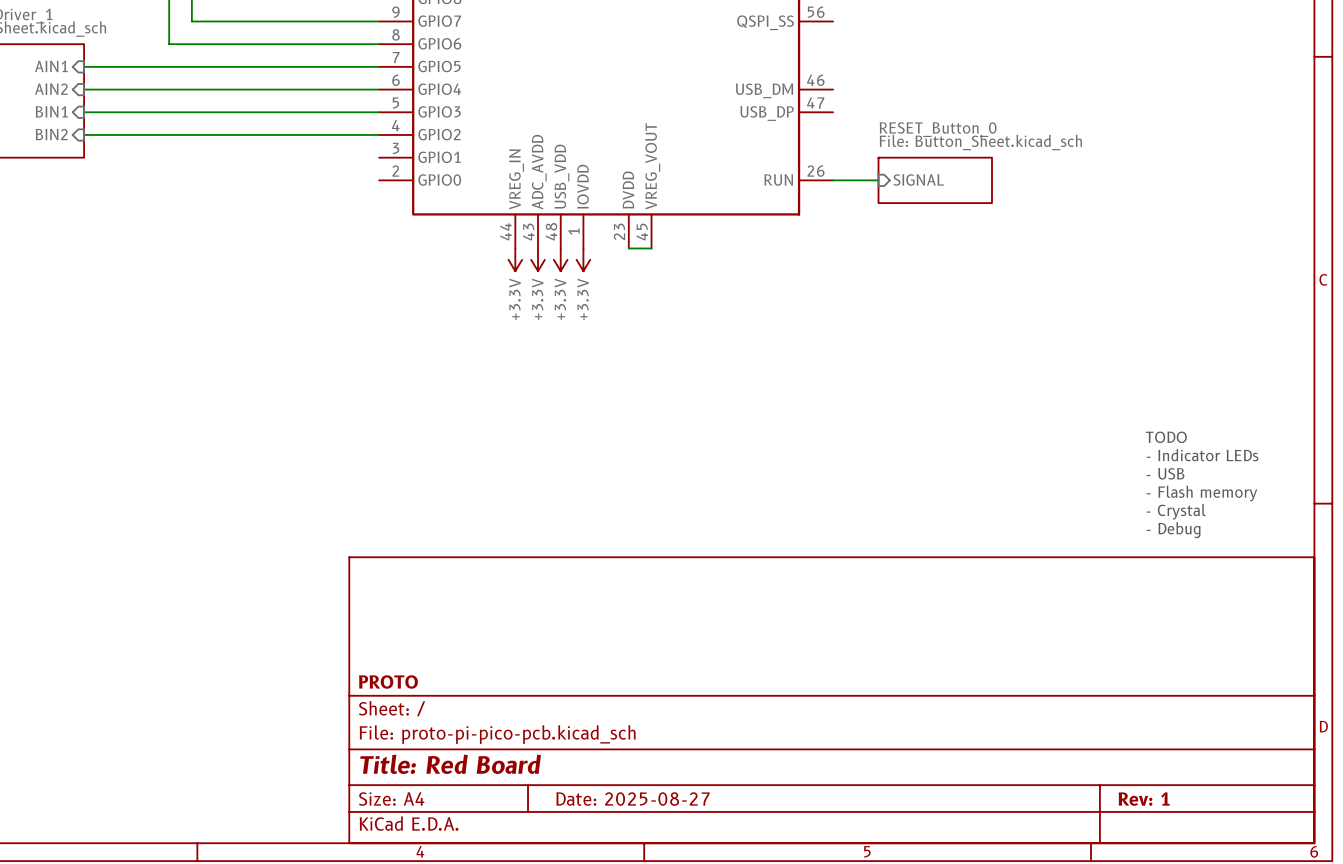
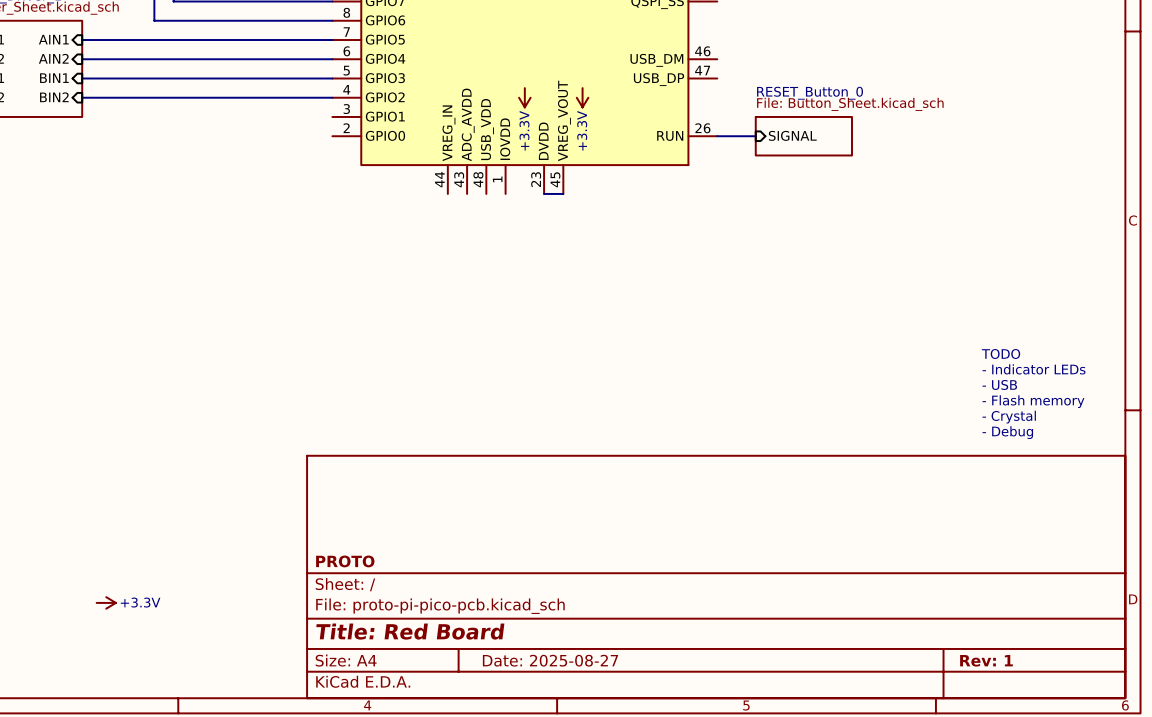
power symbol: none -> +3.3V (524, 97)
power symbol: none -> +3.3V (582, 97)
power symbol: +3.3V (515, 259) -> none
power symbol: +3.3V (538, 259) -> none
power symbol: +3.3V (560, 259) -> none
power symbol: +3.3V (583, 259) -> none
power symbol: none -> +3.3V (106, 602)

